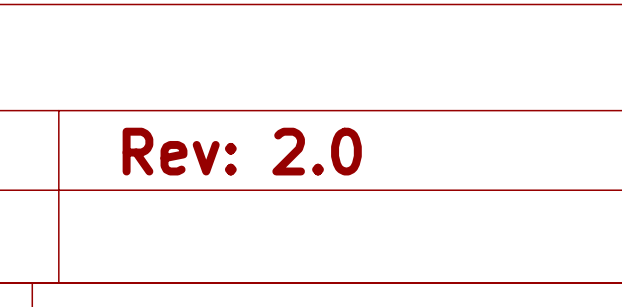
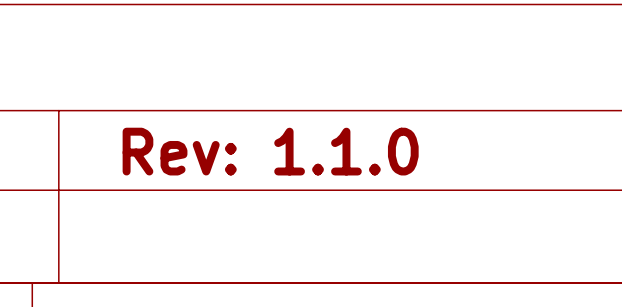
title block: Rev: 2.0 (242, 151) -> Rev: 1.1.0 (270, 151)

